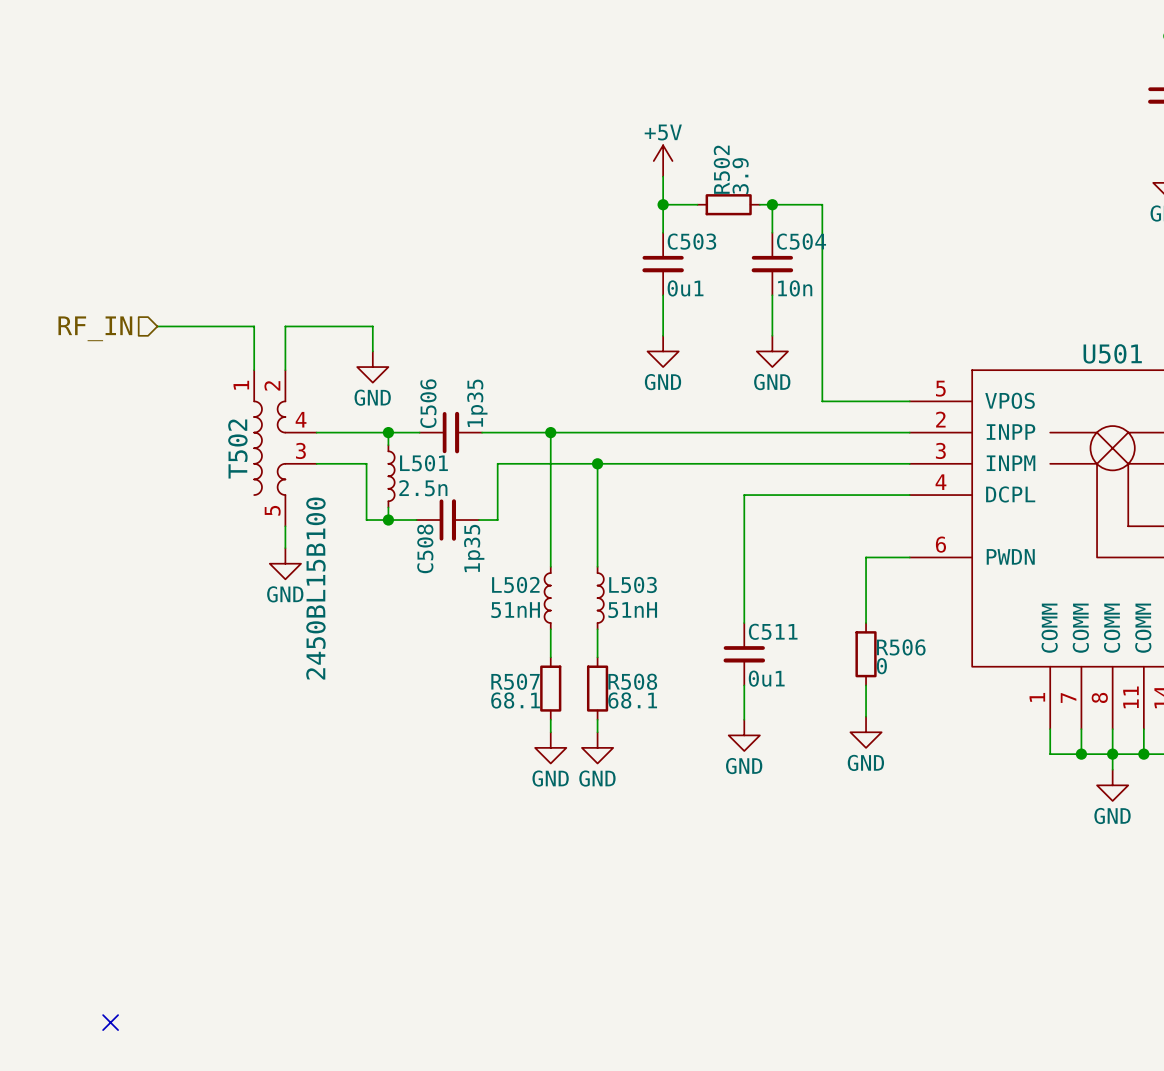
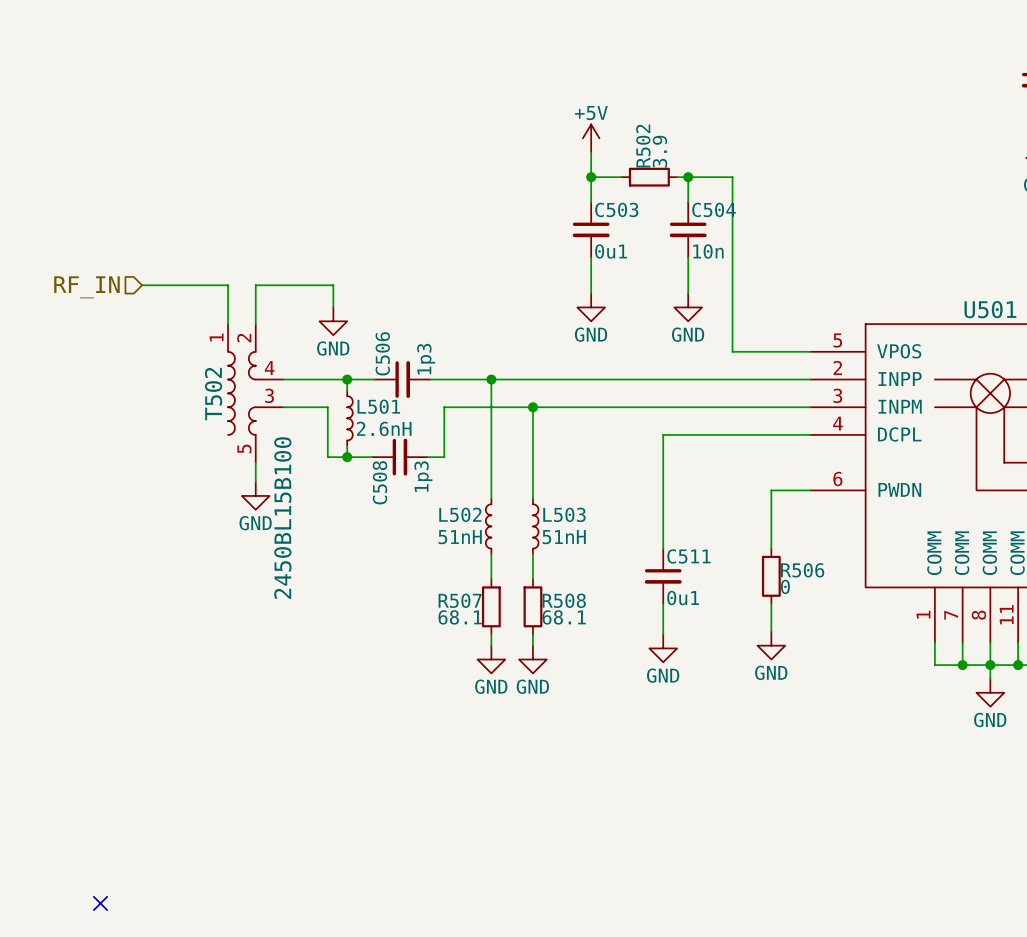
C506 value: 1p35 (477, 403) -> 1p3 (426, 359)
L501 value: 2.5n (423, 488) -> 2.6nH (384, 428)
C508 value: 1p35 (474, 548) -> 1p3 (423, 476)

